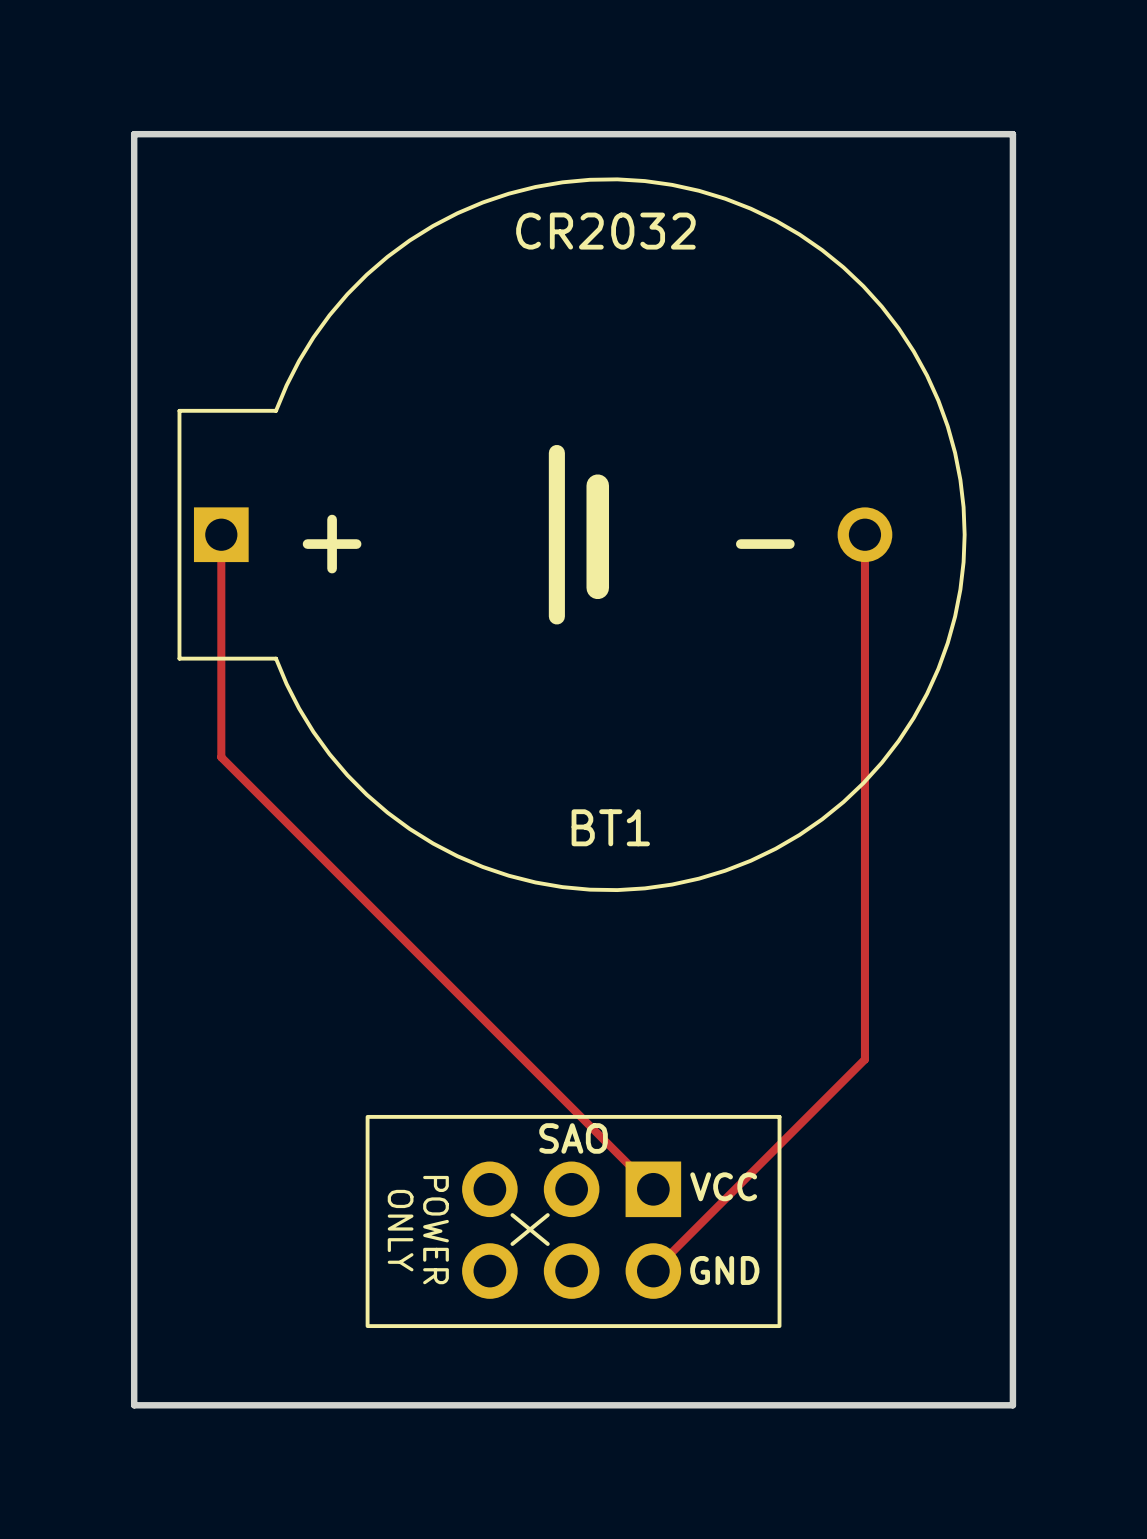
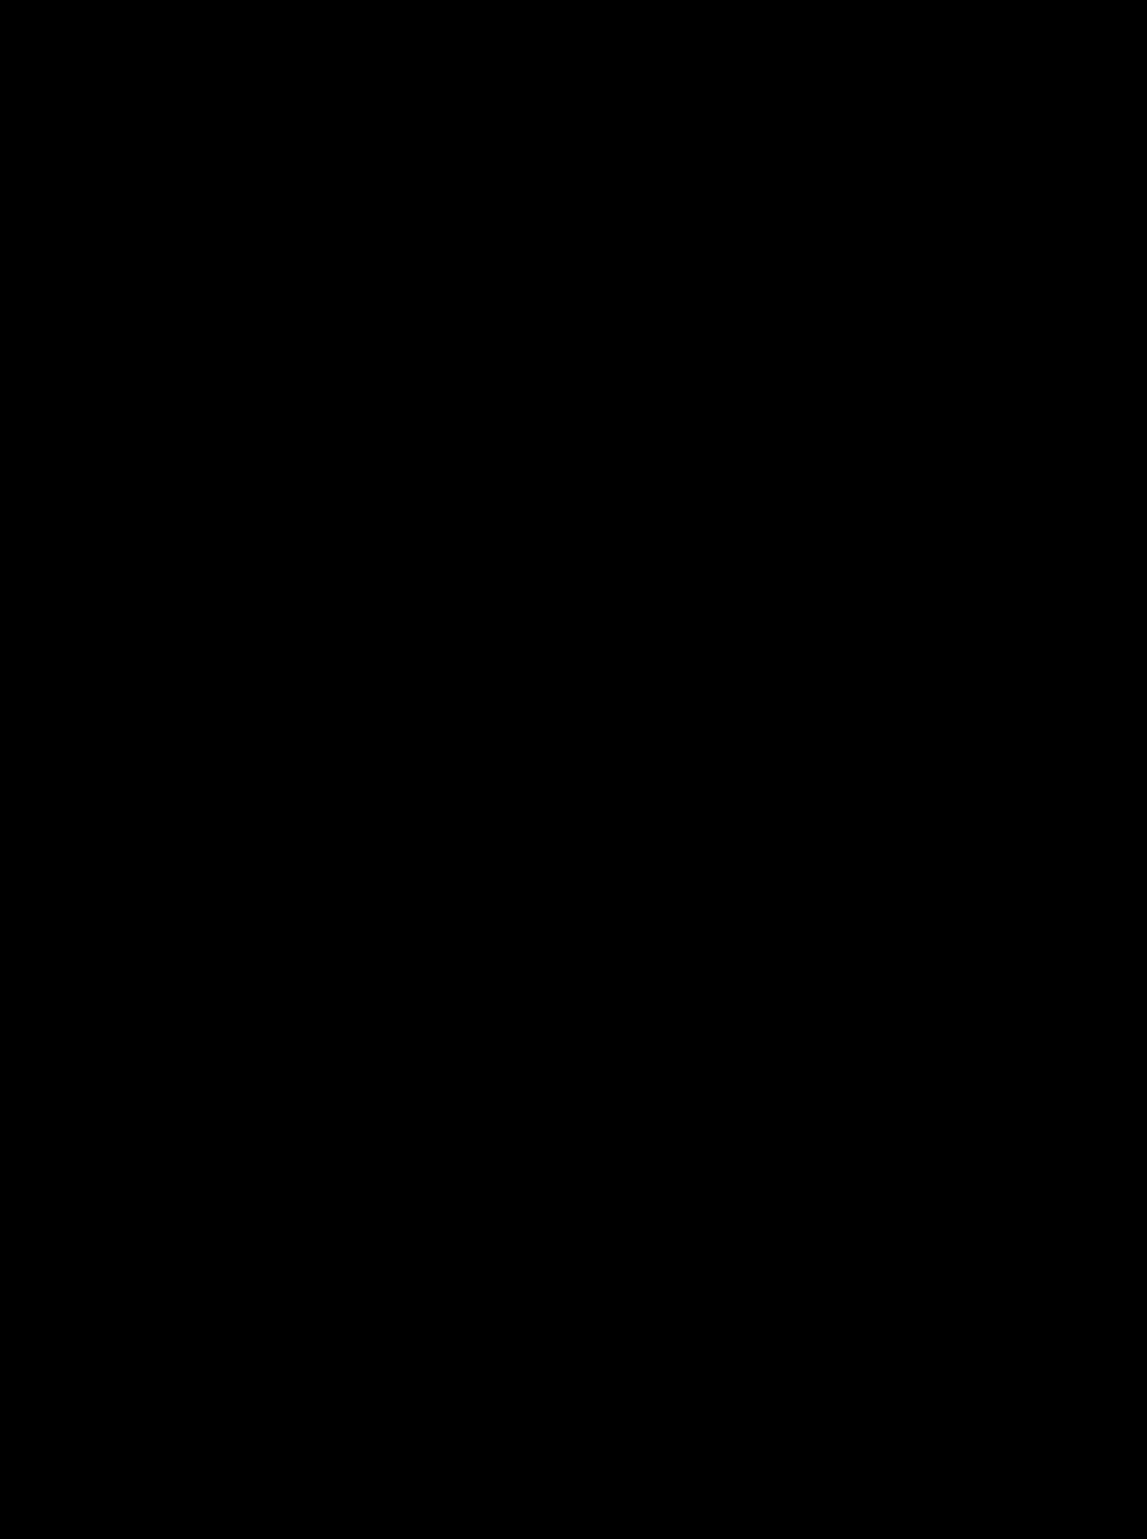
board edge: (1012, 134) (134, 134) (134, 1405) (1012, 1405) (1012, 134) -> none
top track: (221, 534) (221, 757) (653, 1189) -> none
BT1: (572, 534) -> none
top track: (864, 534) (864, 1059) (653, 1271) -> none
part: (573, 1221) -> none

